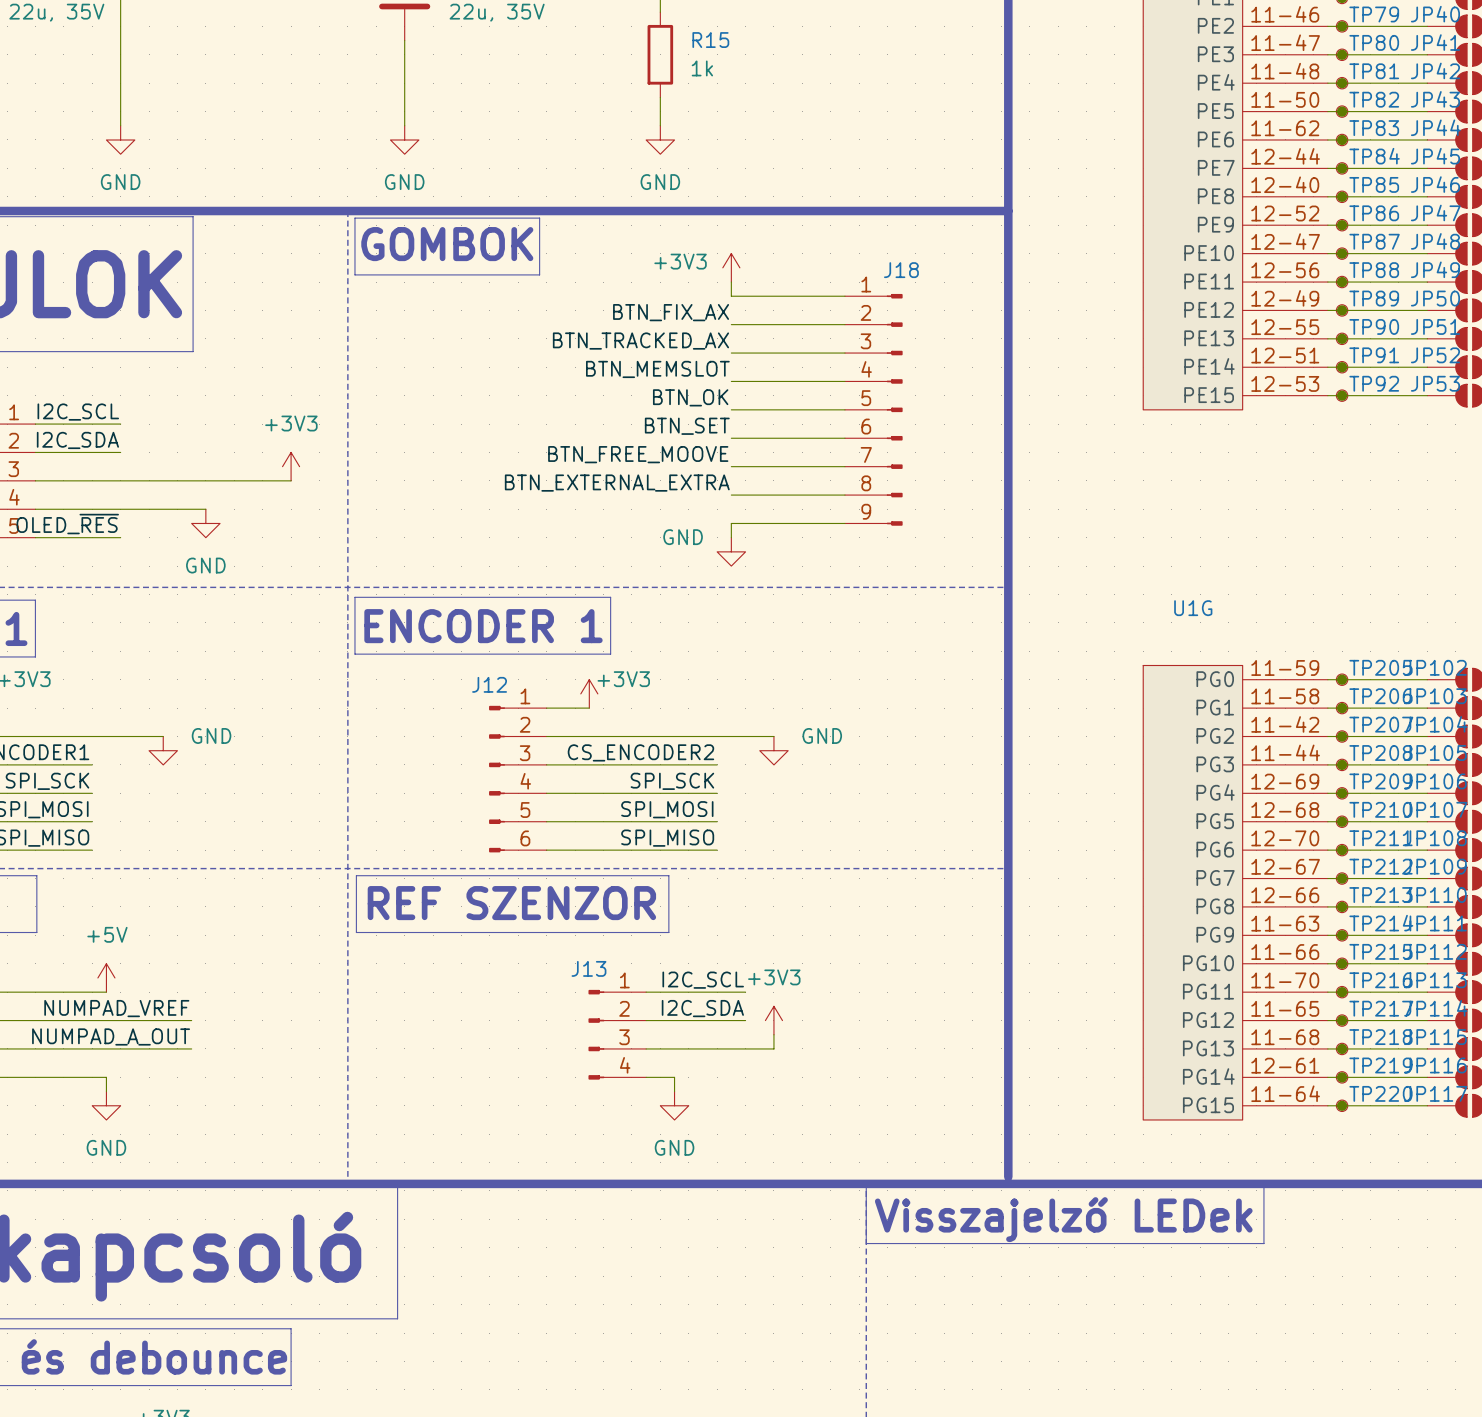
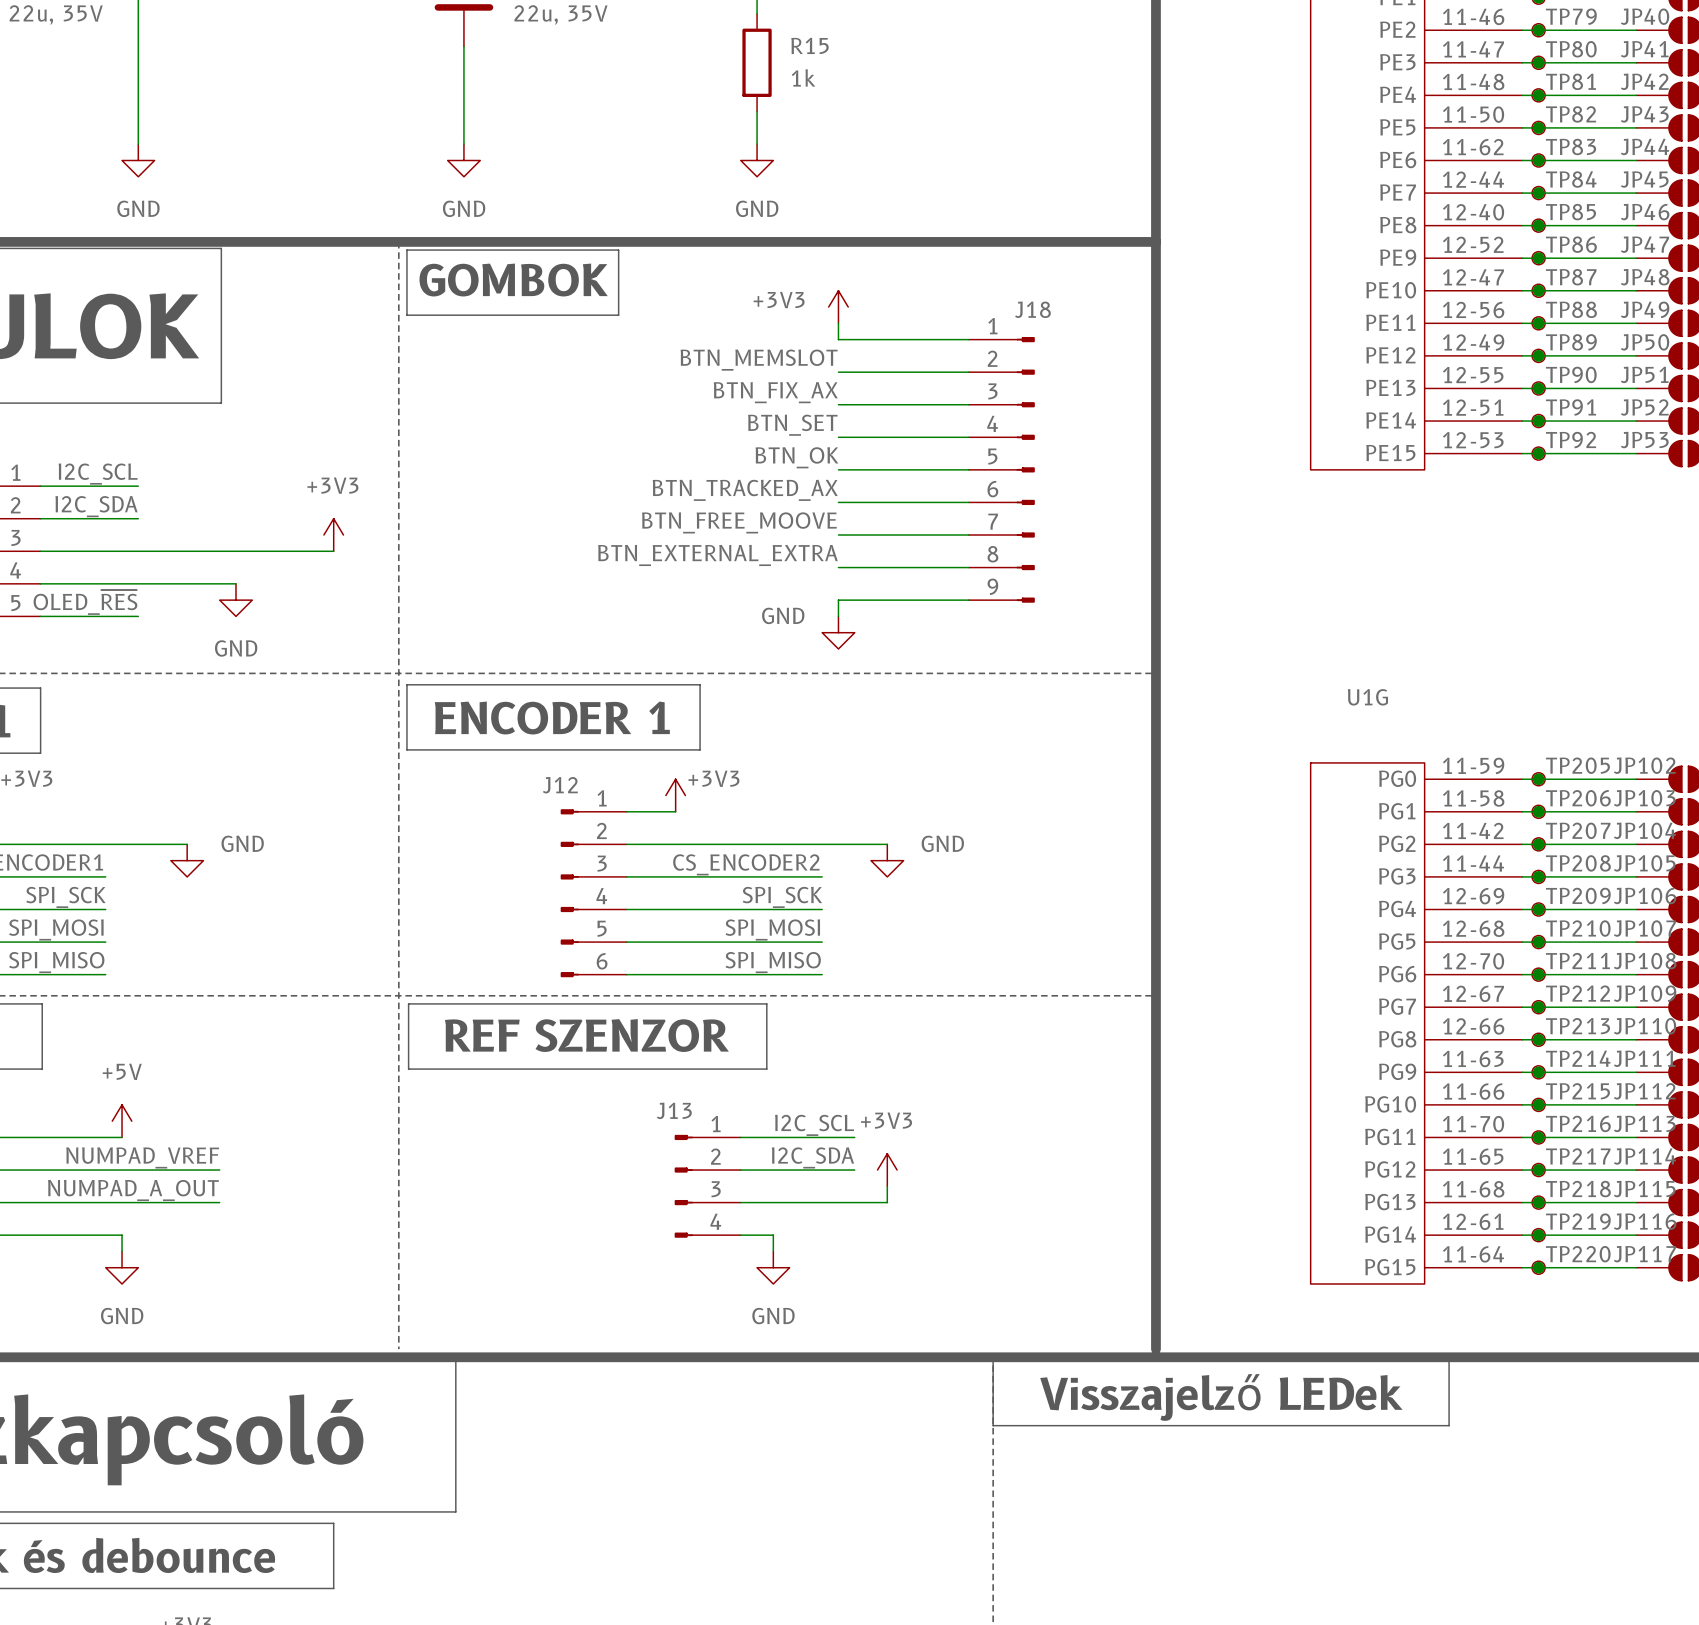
label: BTN_FIX_AX (671, 312) -> BTN_MEMSLOT (759, 360)
label: BTN_TRACKED_AX (640, 341) -> BTN_FIX_AX (775, 392)
label: BTN_MEMSLOT (657, 369) -> BTN_SET (792, 425)
label: BTN_SET (687, 426) -> BTN_TRACKED_AX (745, 490)

